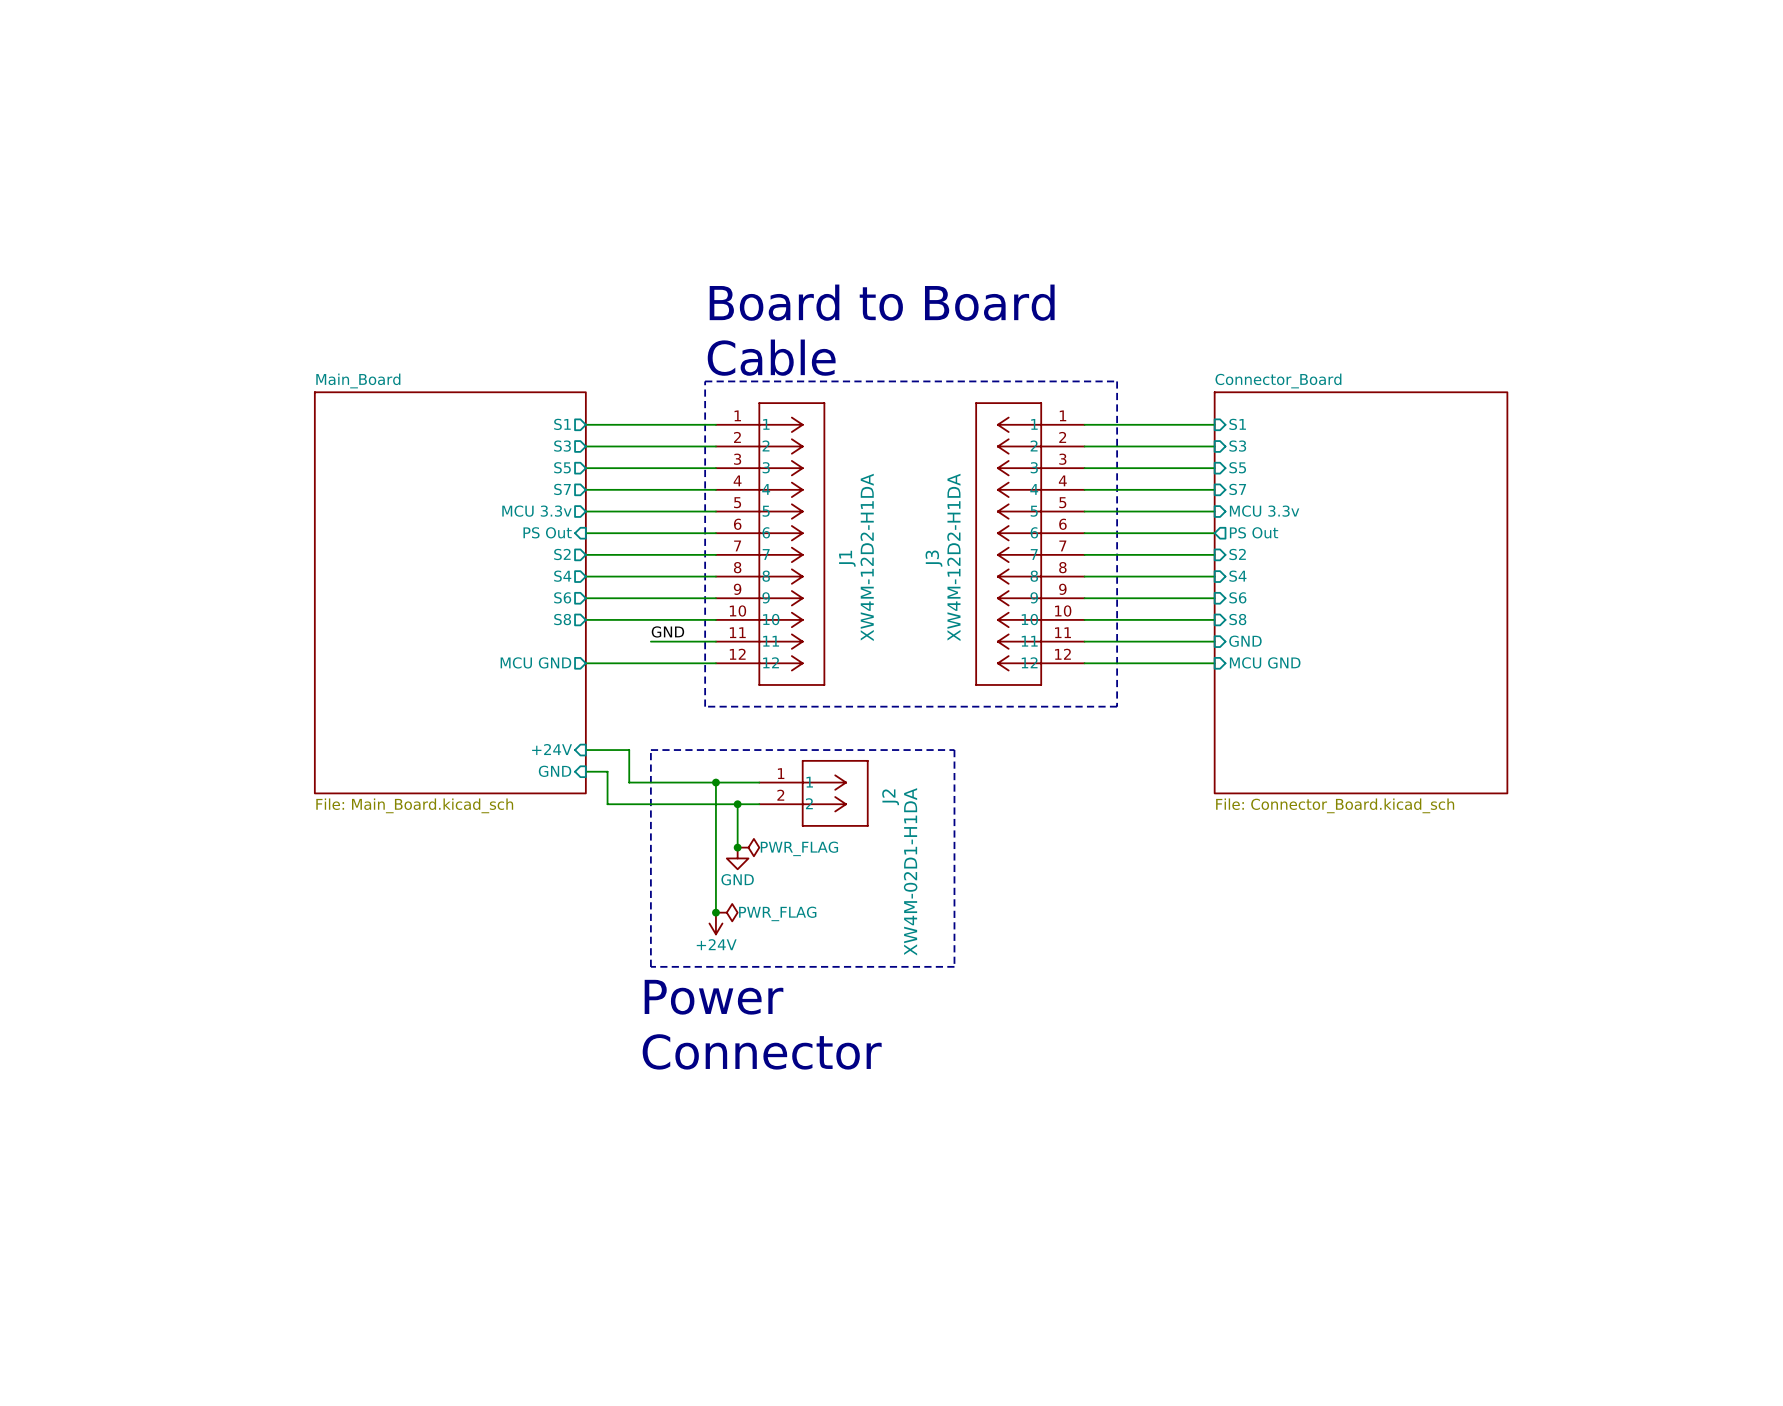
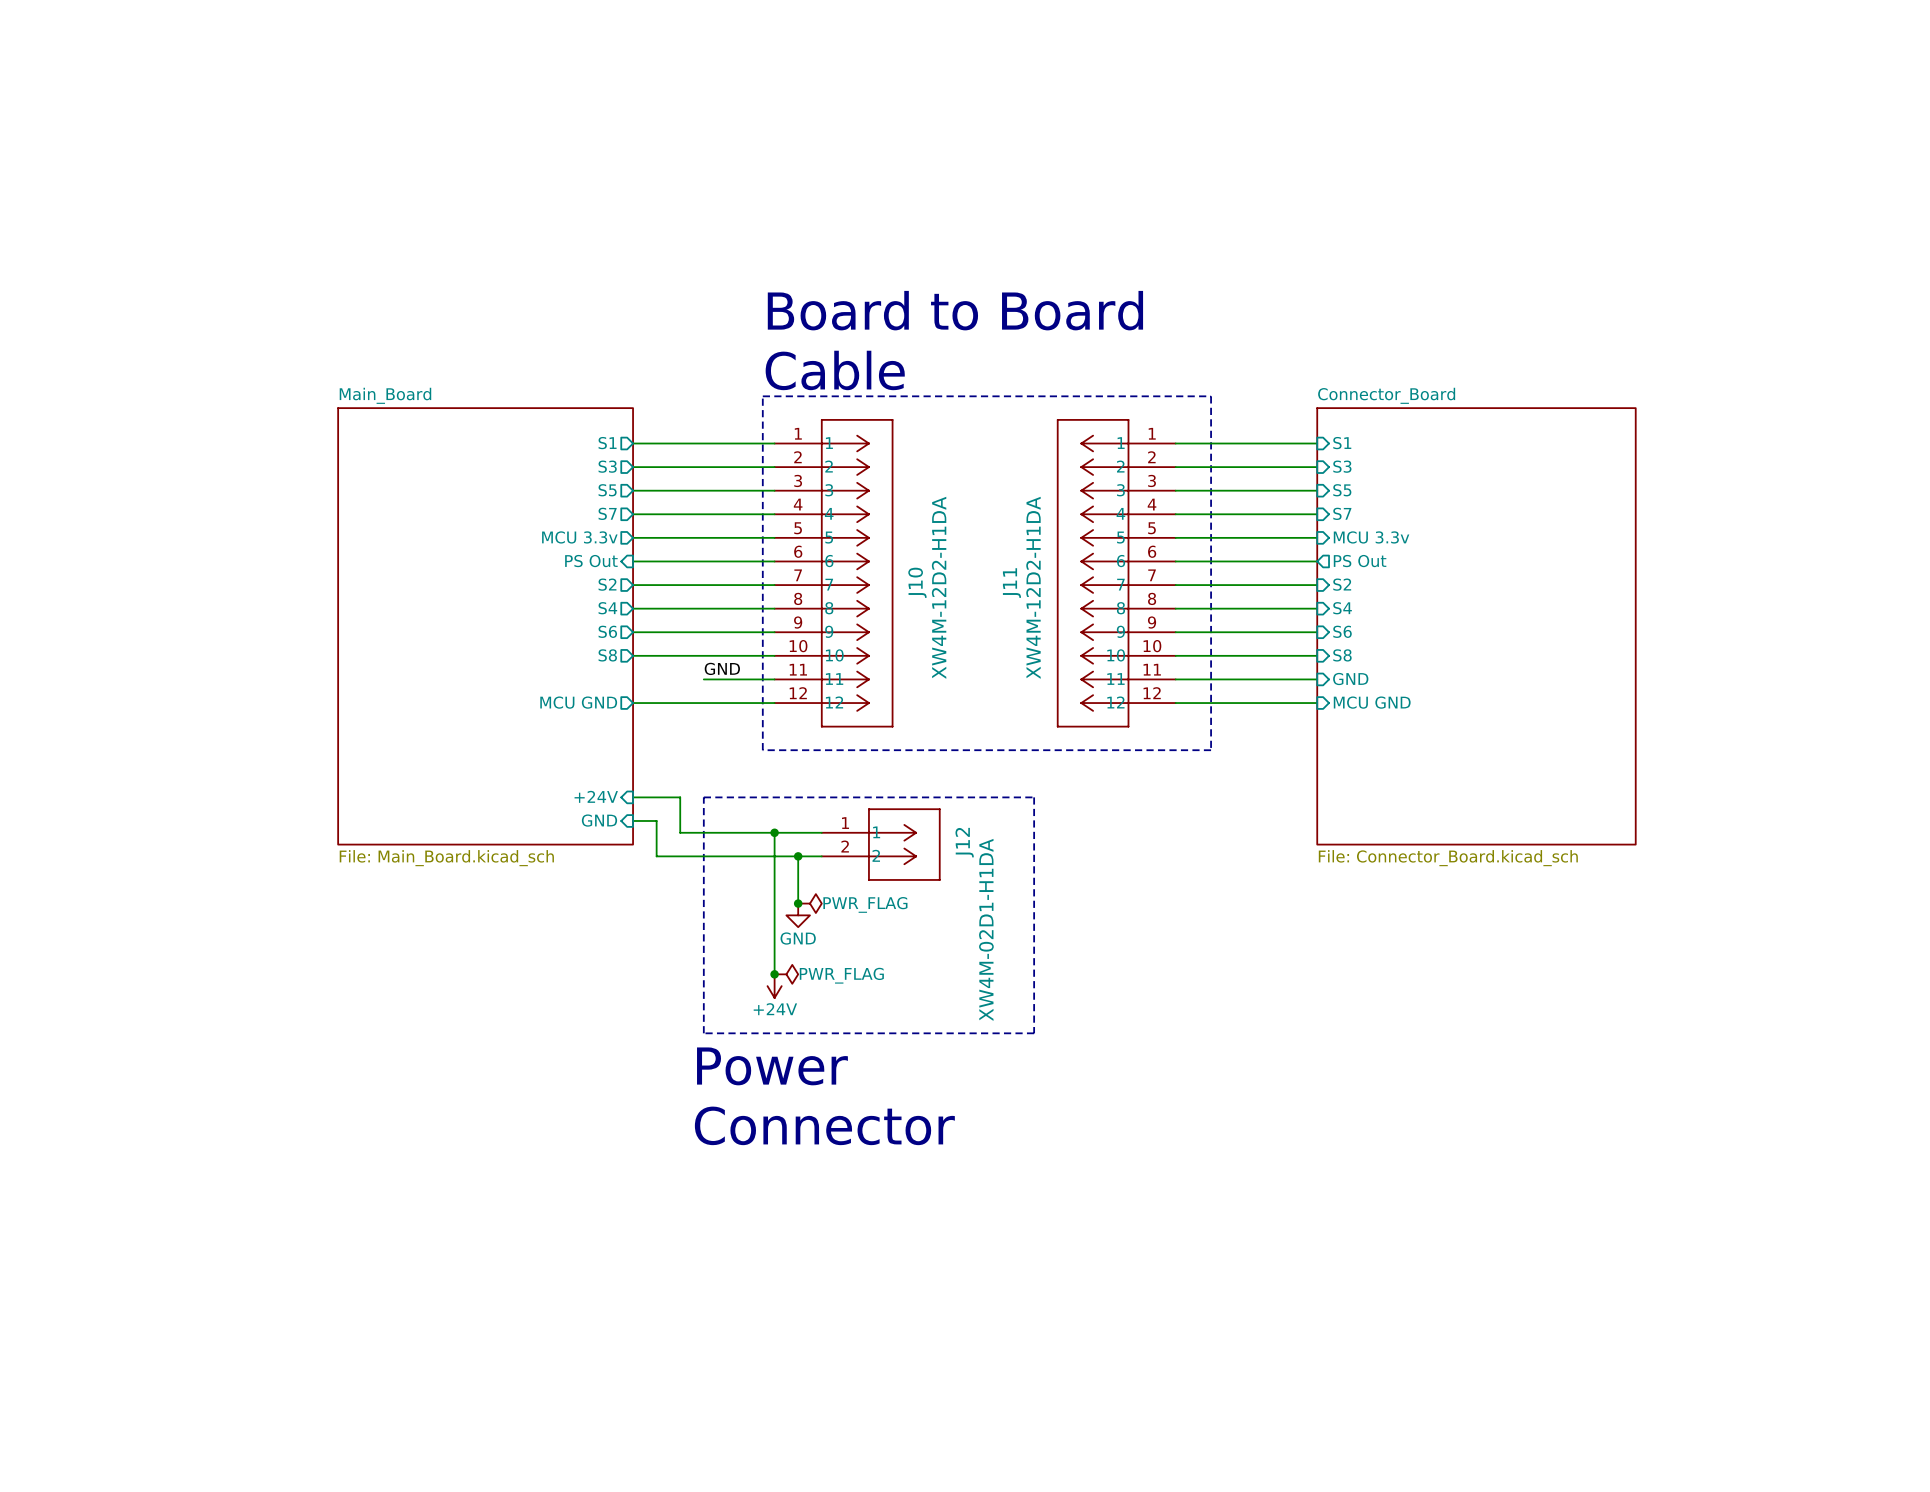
J1 name: J1 (847, 558) -> J10 (917, 582)
J3 name: J3 (933, 558) -> J11 (1011, 583)
J2 name: J2 (890, 797) -> J12 (964, 842)

